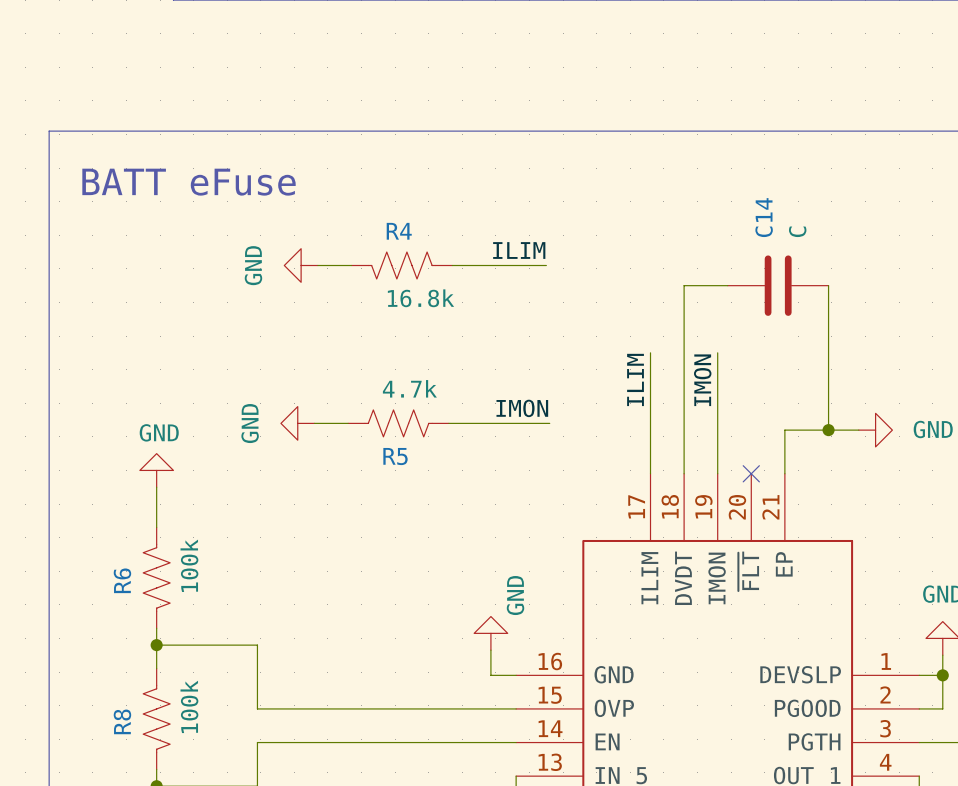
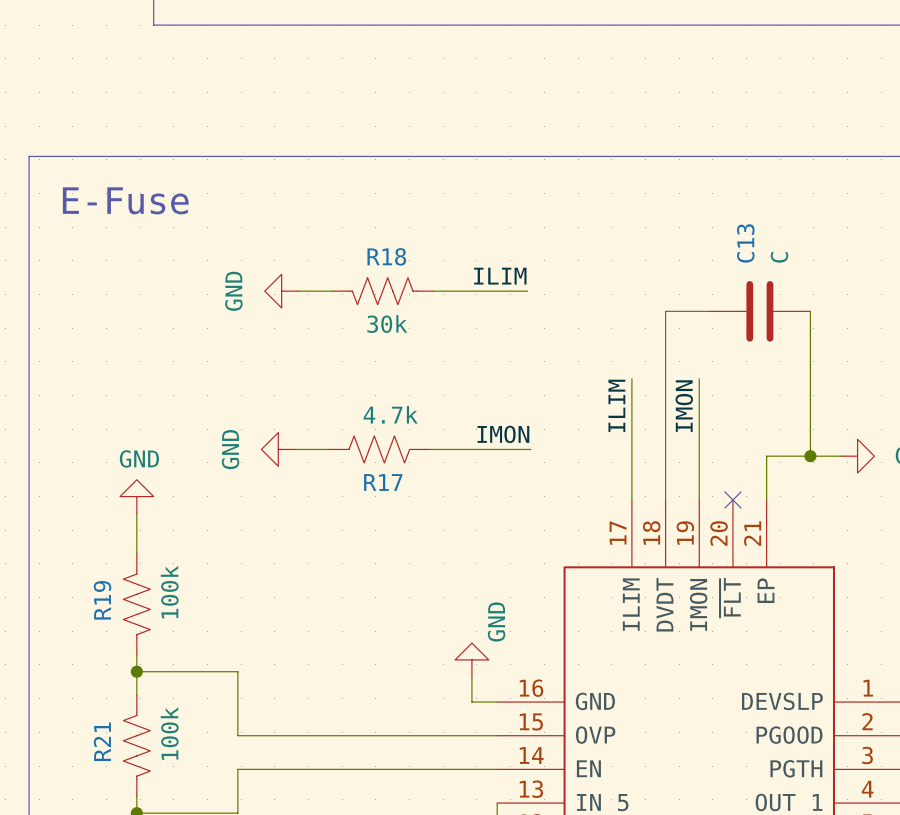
text: BATT eFuse (189, 182) -> E-Fuse (125, 200)
C14 name: C14 (764, 217) -> C13 (745, 243)
R4 name: R4 (399, 231) -> R18 (386, 256)
R4 value: 16.8k (420, 298) -> 30k (387, 324)
R5 name: R5 (395, 456) -> R17 (383, 482)
R6 name: R6 (122, 580) -> R19 (102, 600)
R8 name: R8 (122, 721) -> R21 (102, 741)

